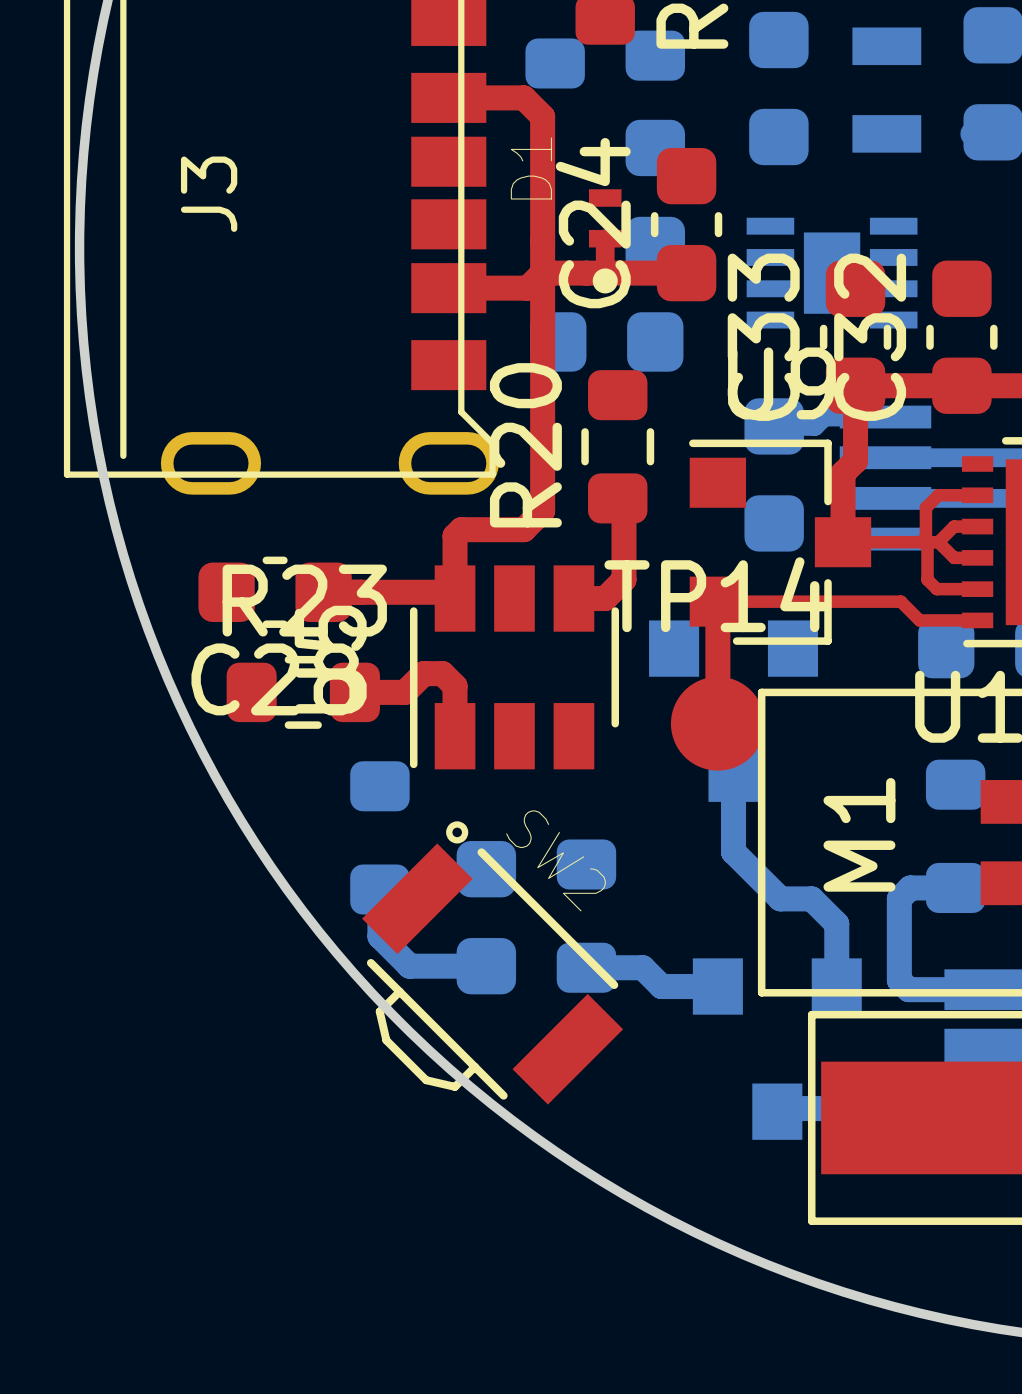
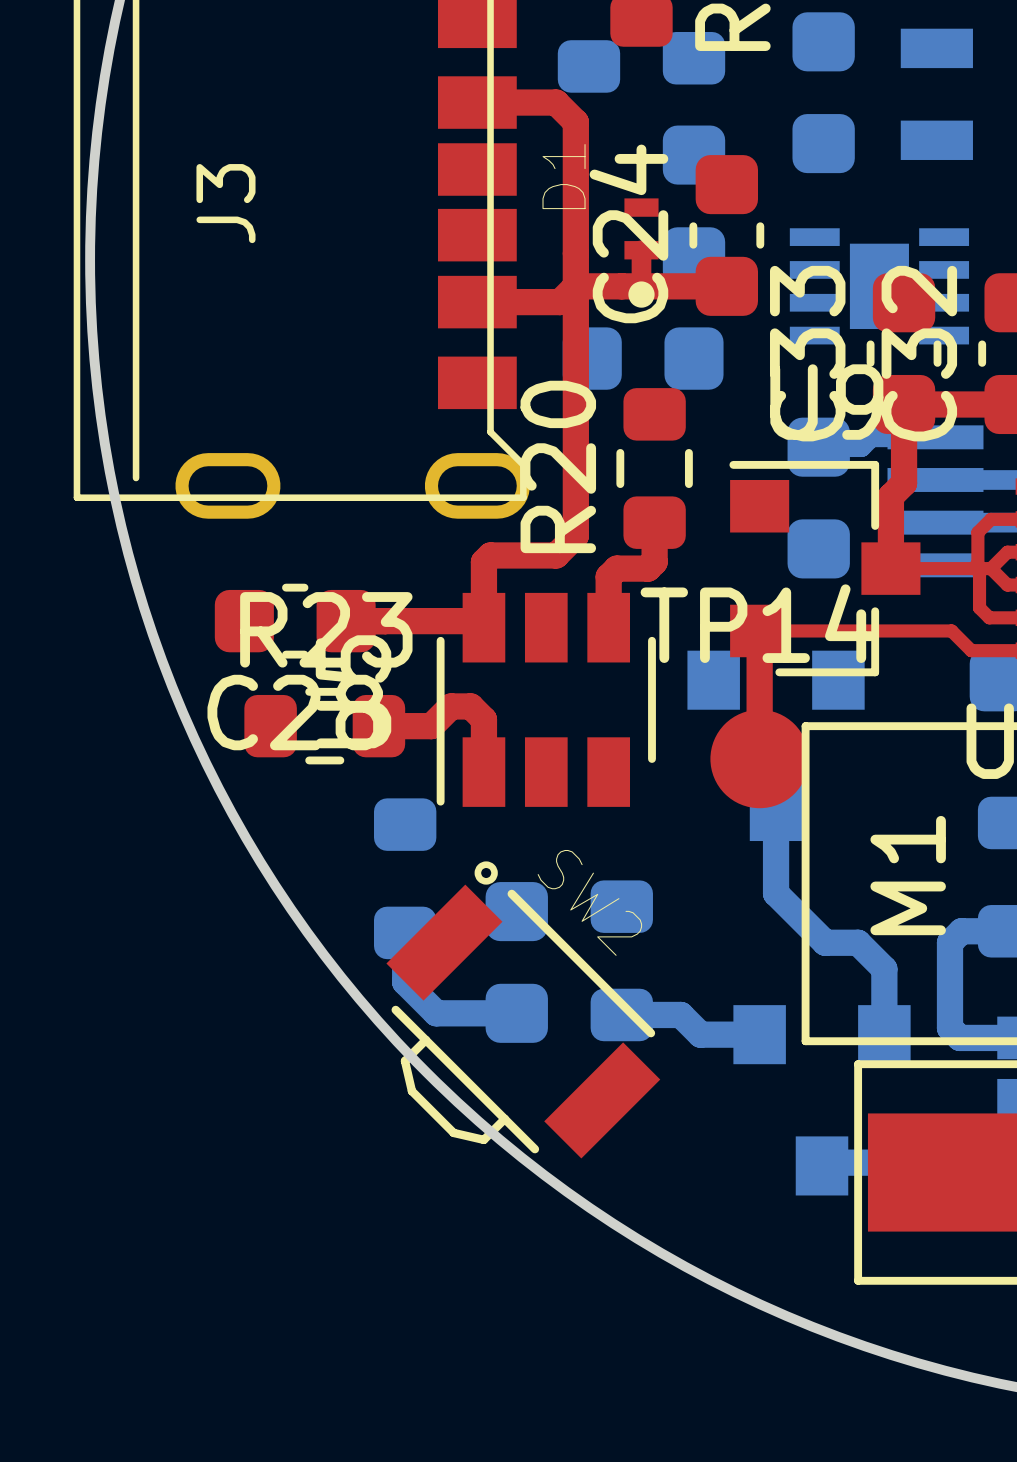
top track: (617, 498) (624, 504) (624, 579) (605, 598) (573, 598) -> (654, 522) (654, 562) (648, 568) (616, 568) (608, 576) (608, 627)

